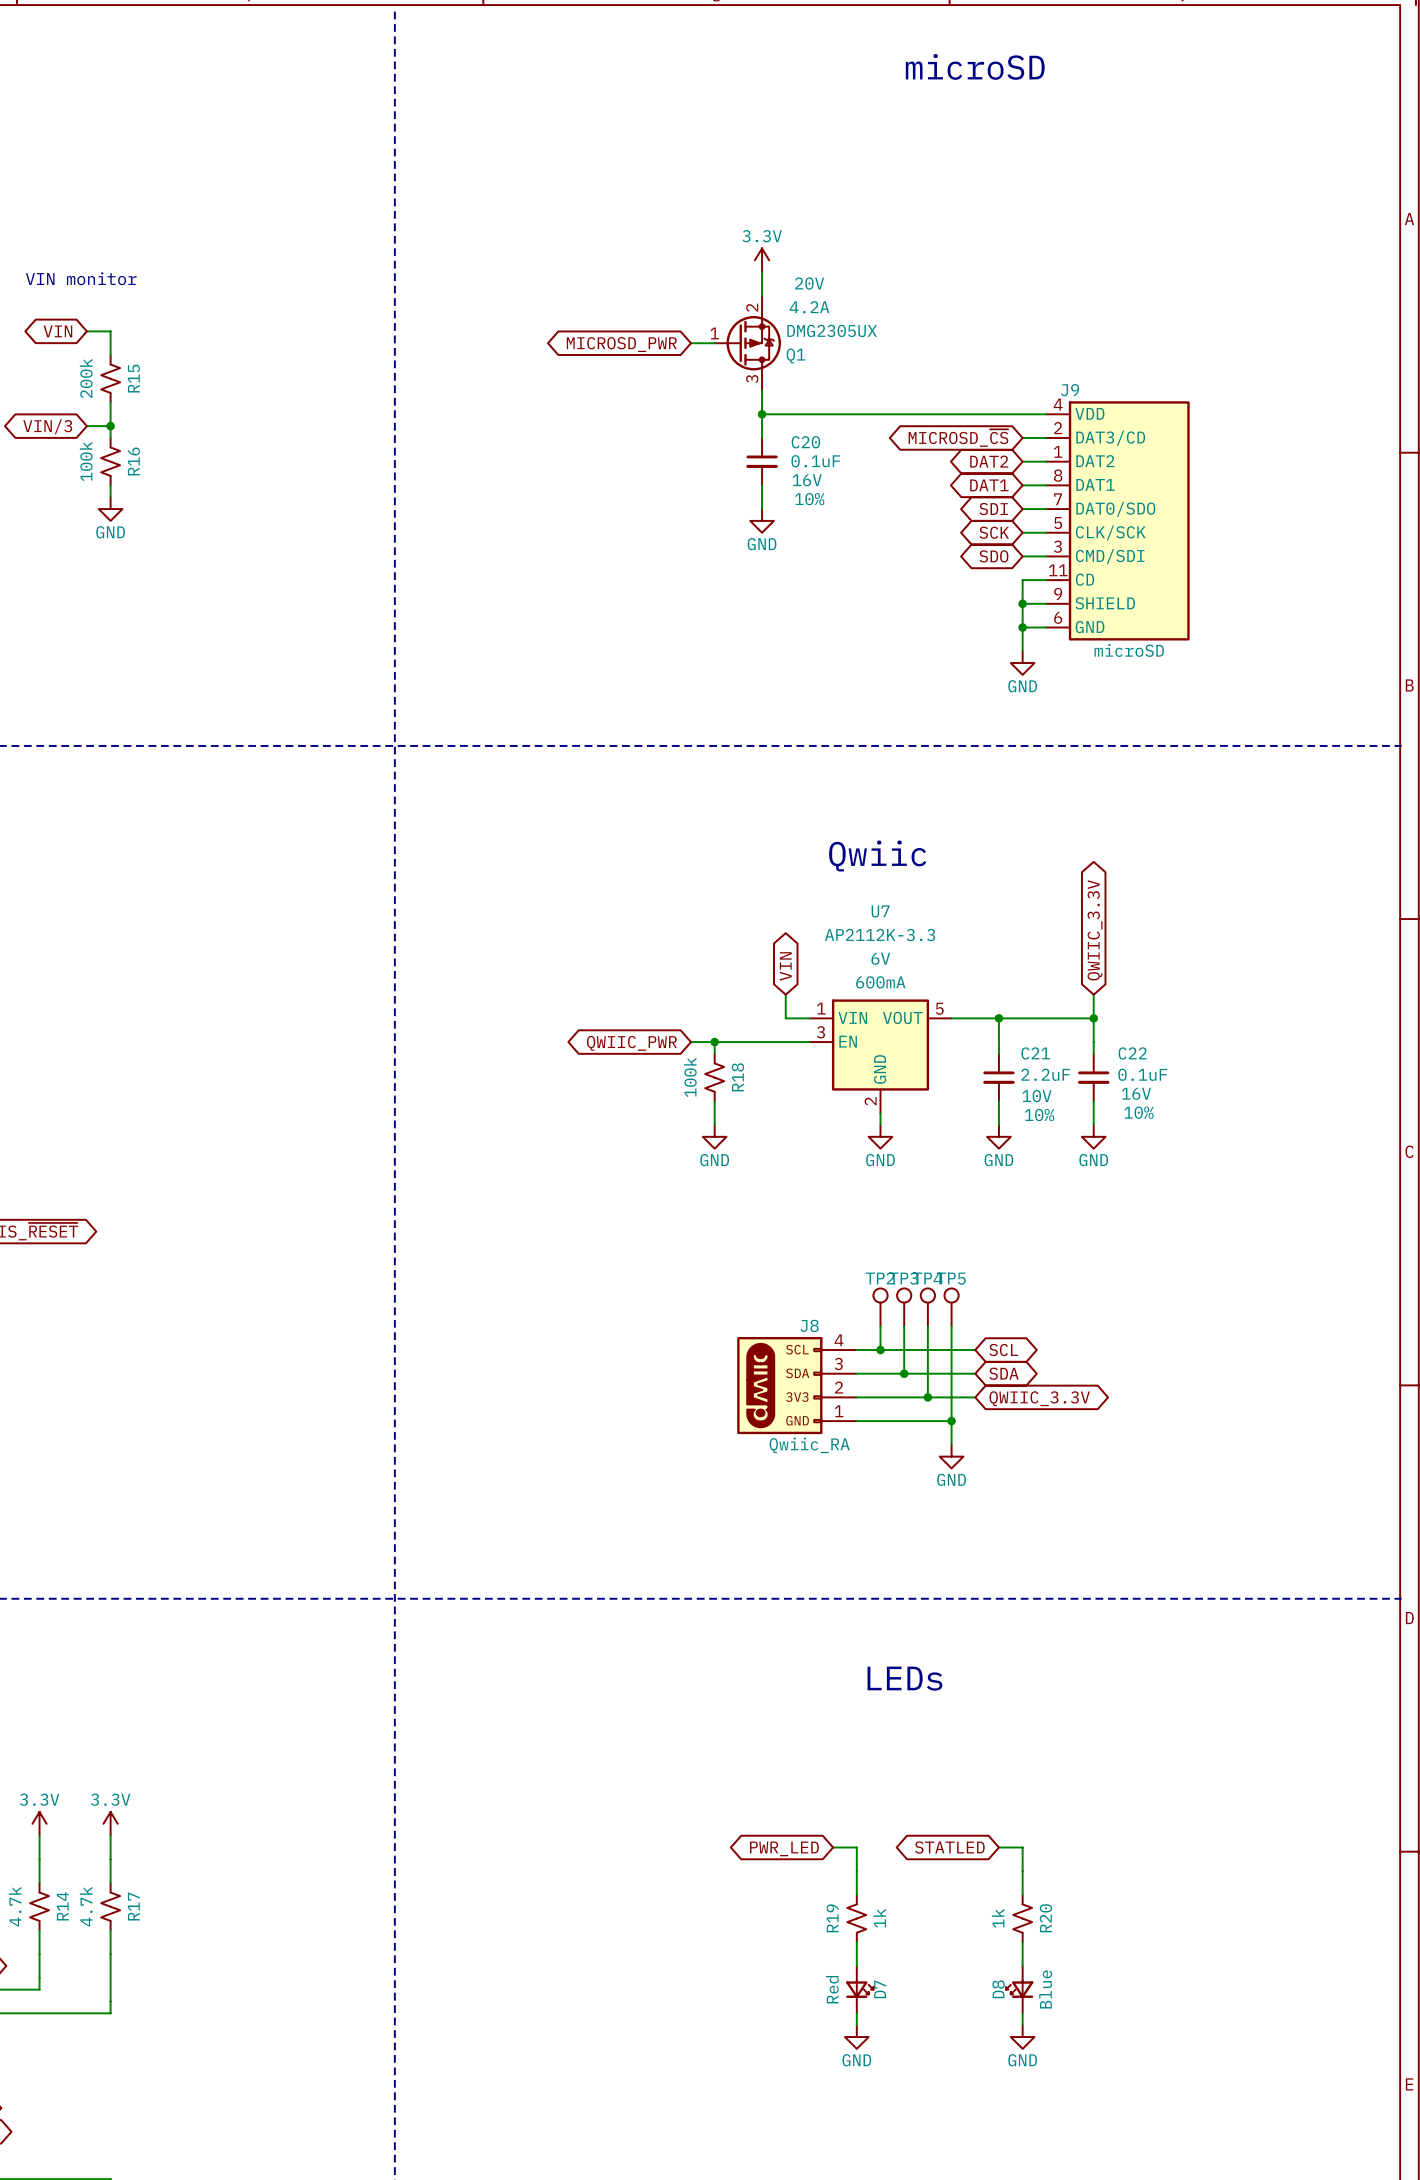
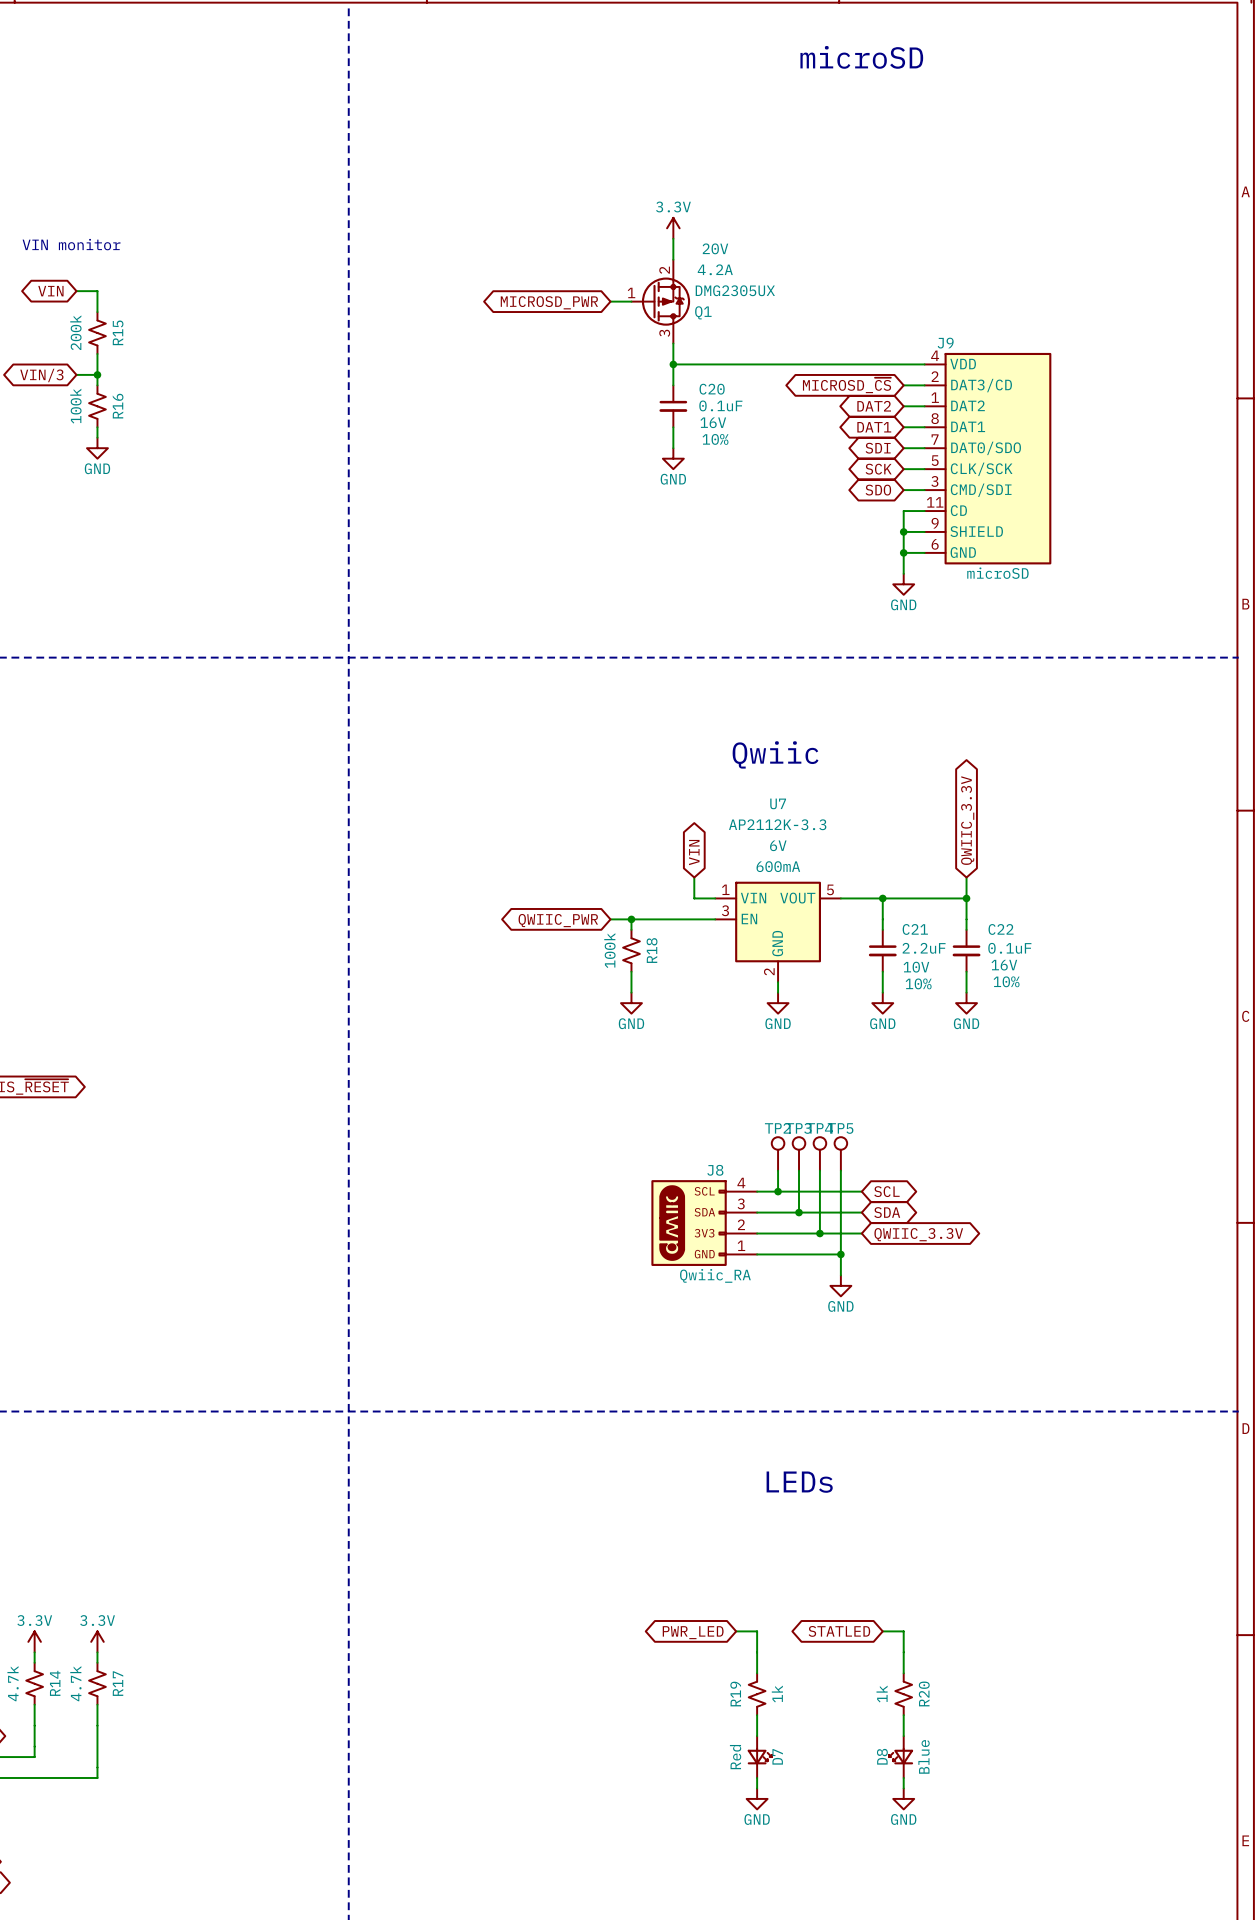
power symbol position: 3.3V (39, 1823) -> 3.3V (34, 1641)
power symbol position: 3.3V (110, 1823) -> 3.3V (97, 1641)

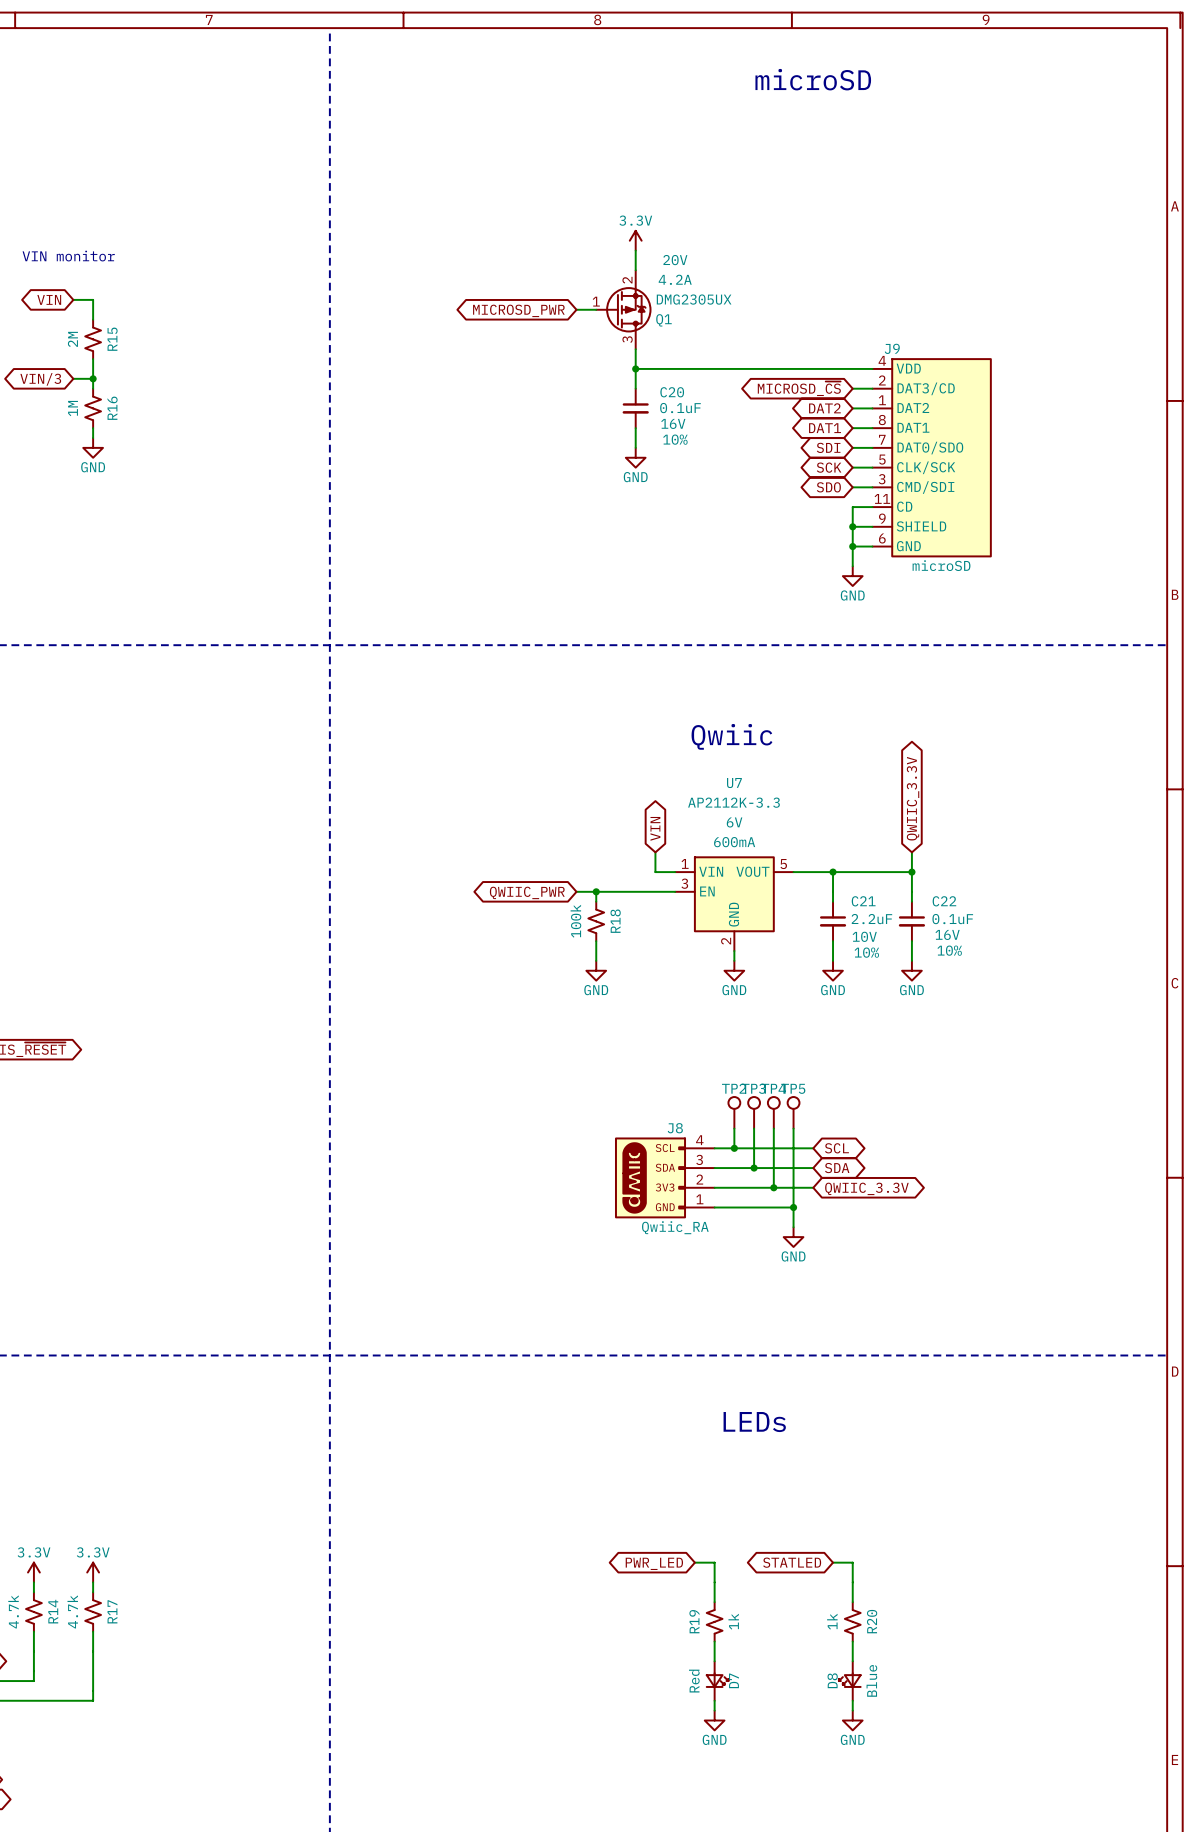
R15 value: 200k (75, 332) -> 2M (72, 339)
R16 value: 100k (75, 406) -> 1M (73, 408)

